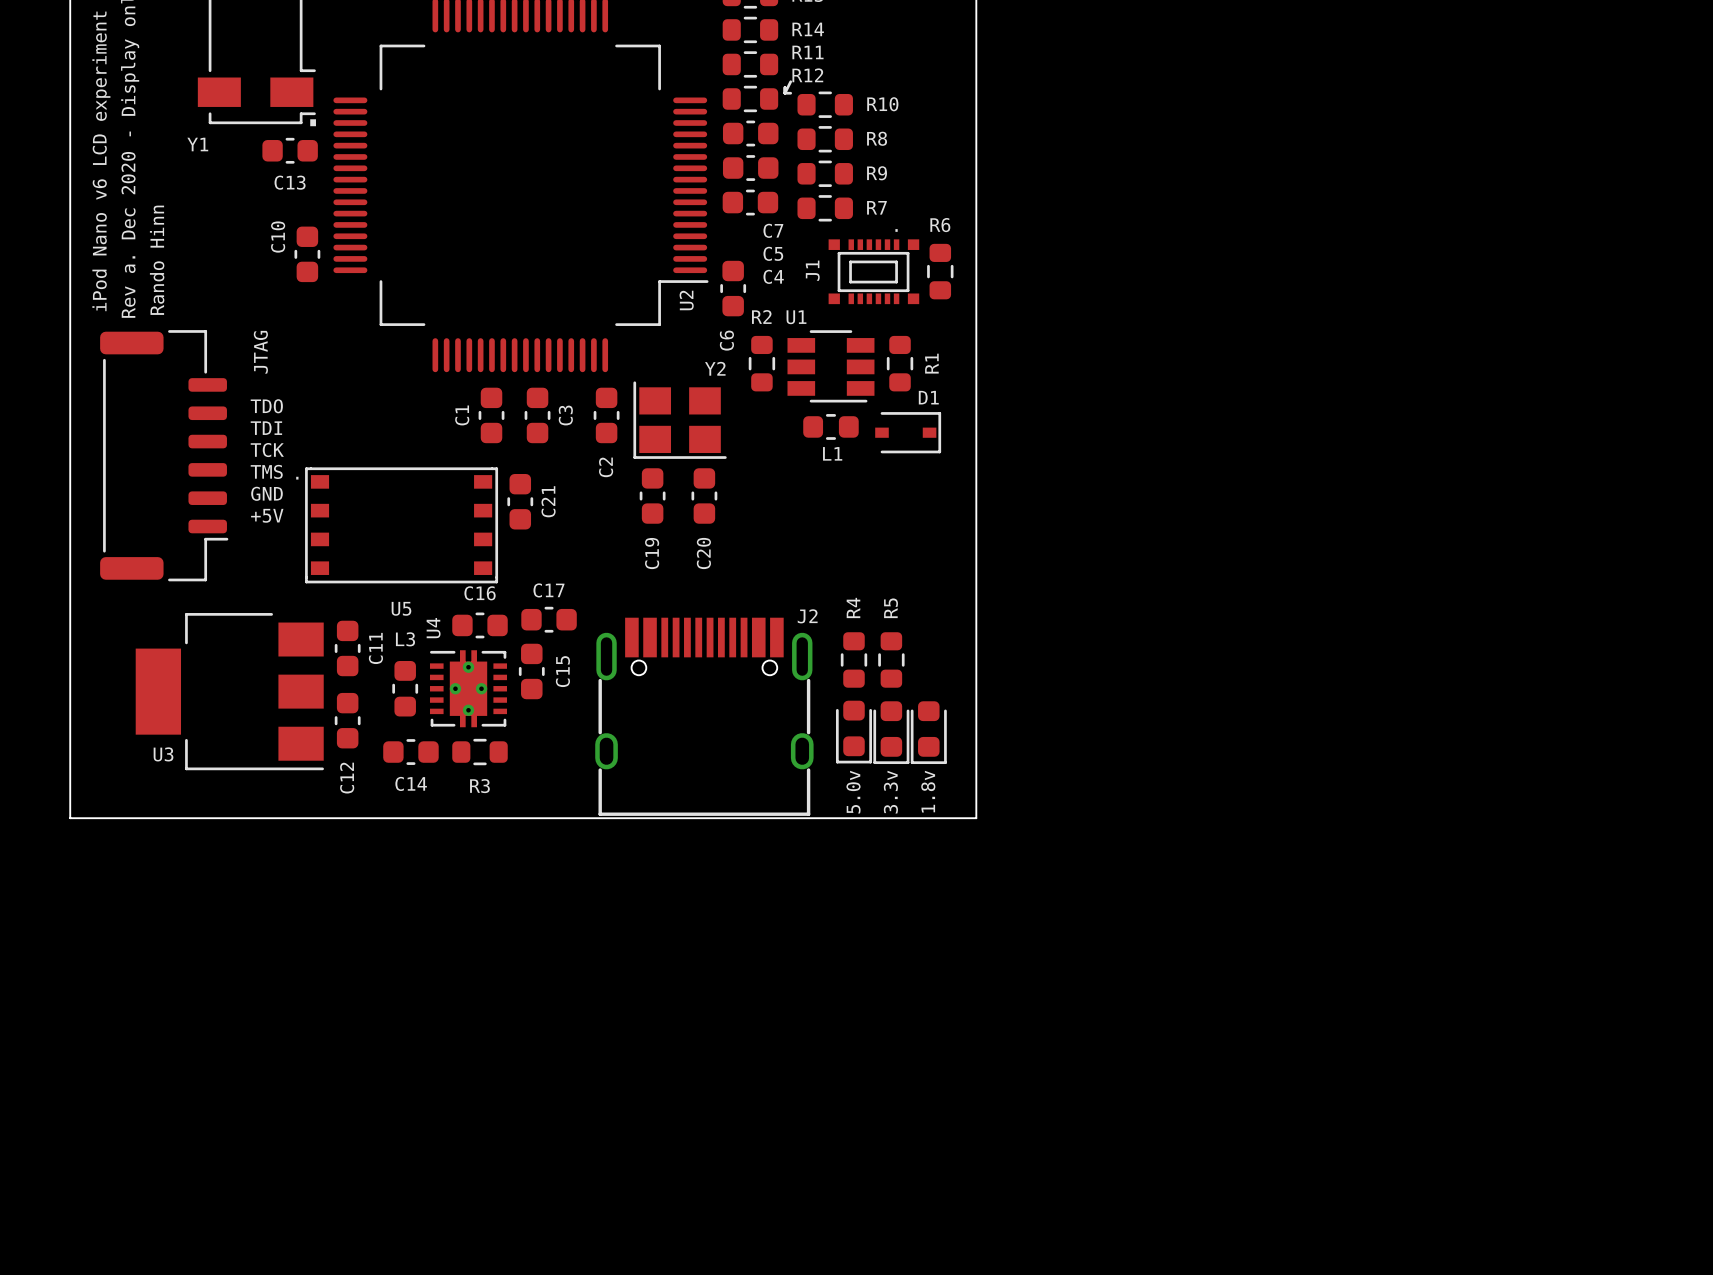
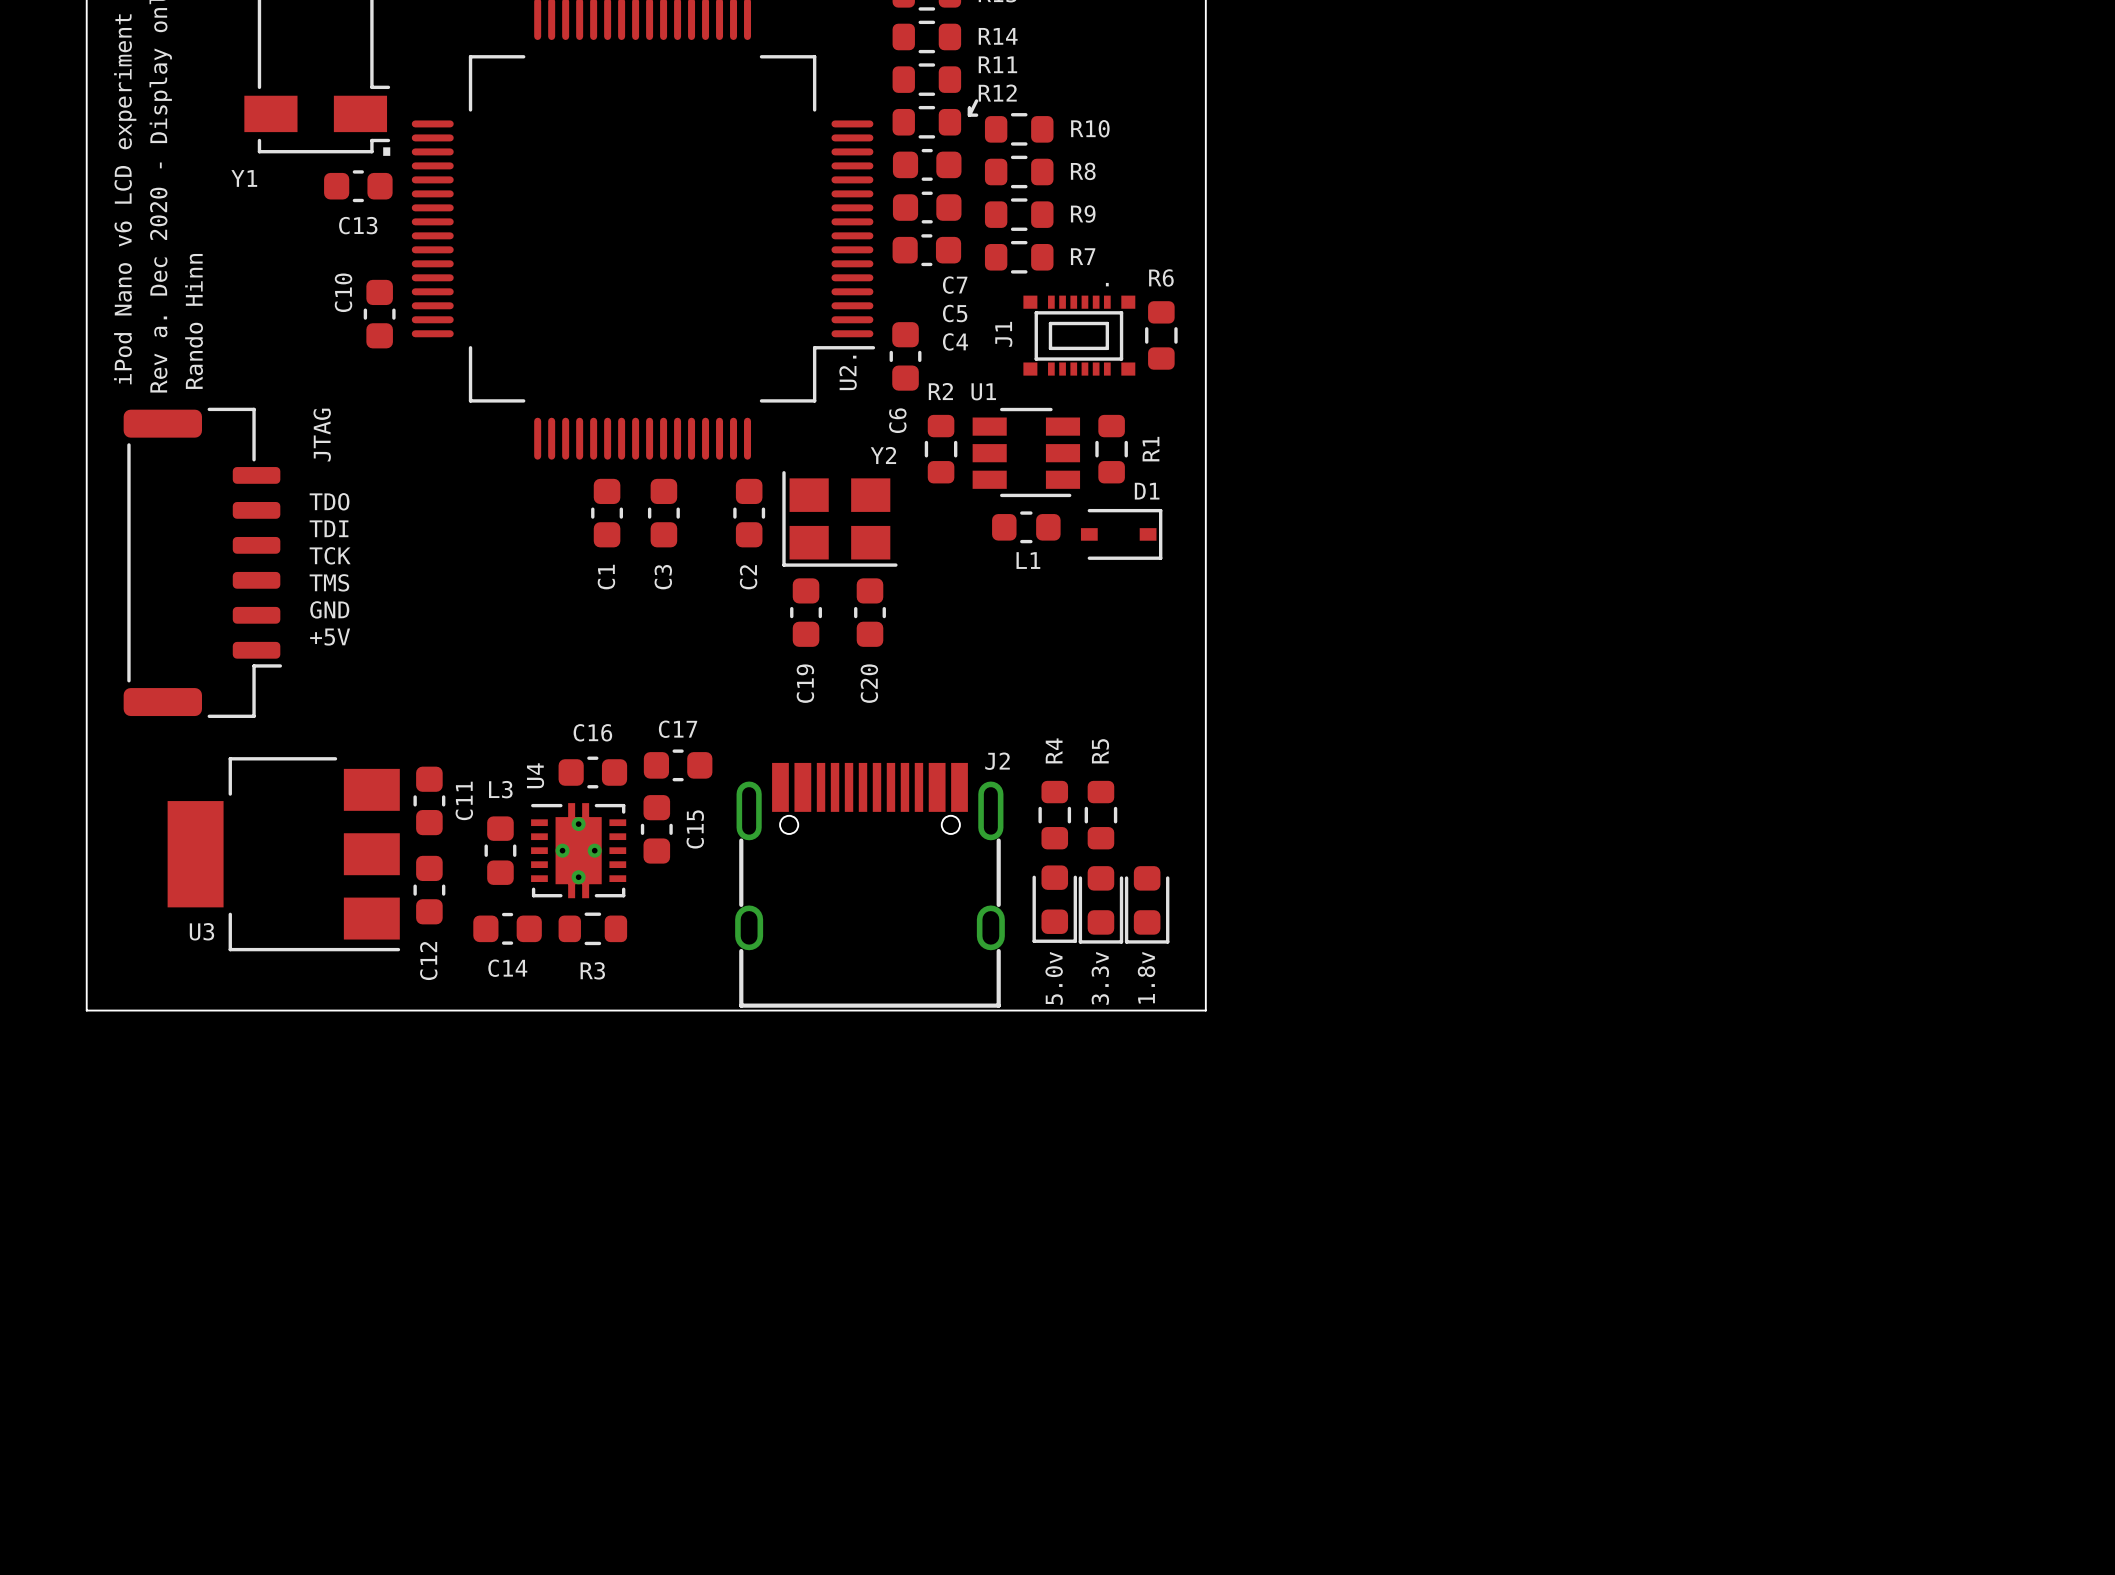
U2 name: U2 (686, 300) -> U2. (848, 372)
C1 name position: C1 (462, 415) -> C1 (606, 577)
C3 name position: C3 (565, 415) -> C3 (663, 577)
C21: (520, 501) -> none
U5: (401, 525) -> none

